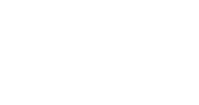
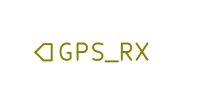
hierarchical label: none -> GPS_RX (103, 52)

